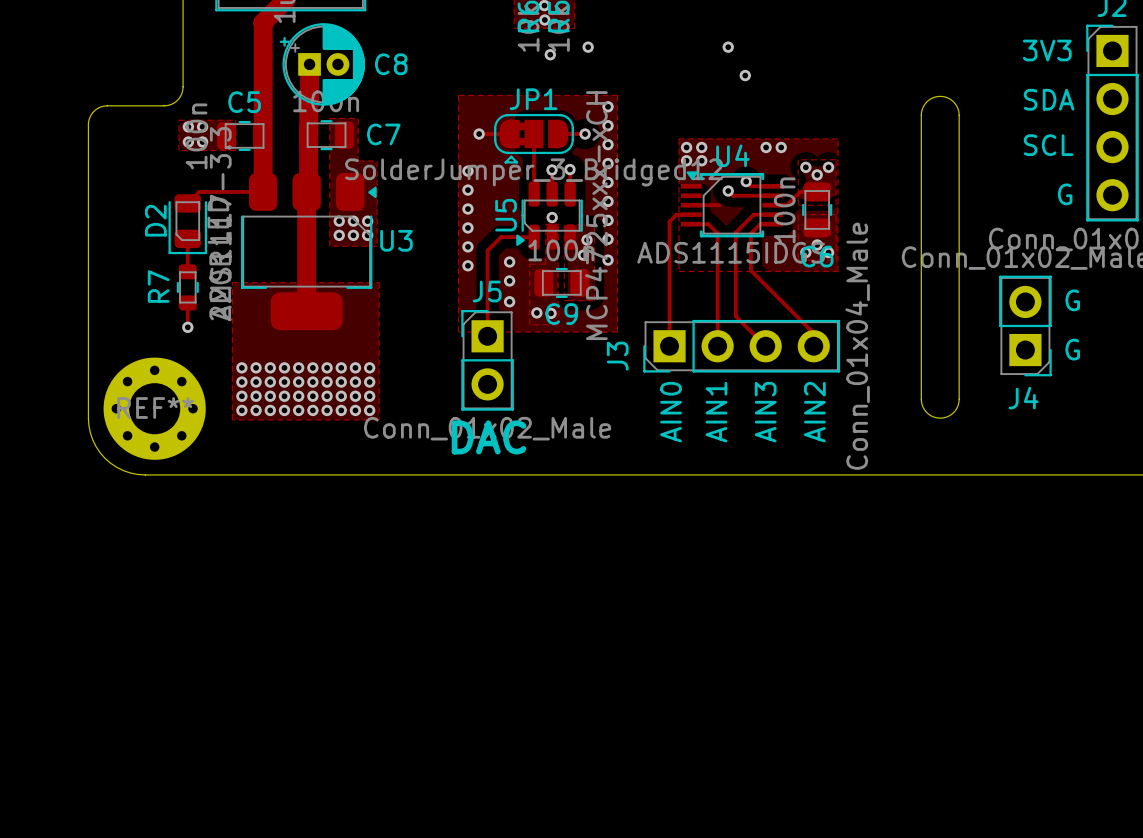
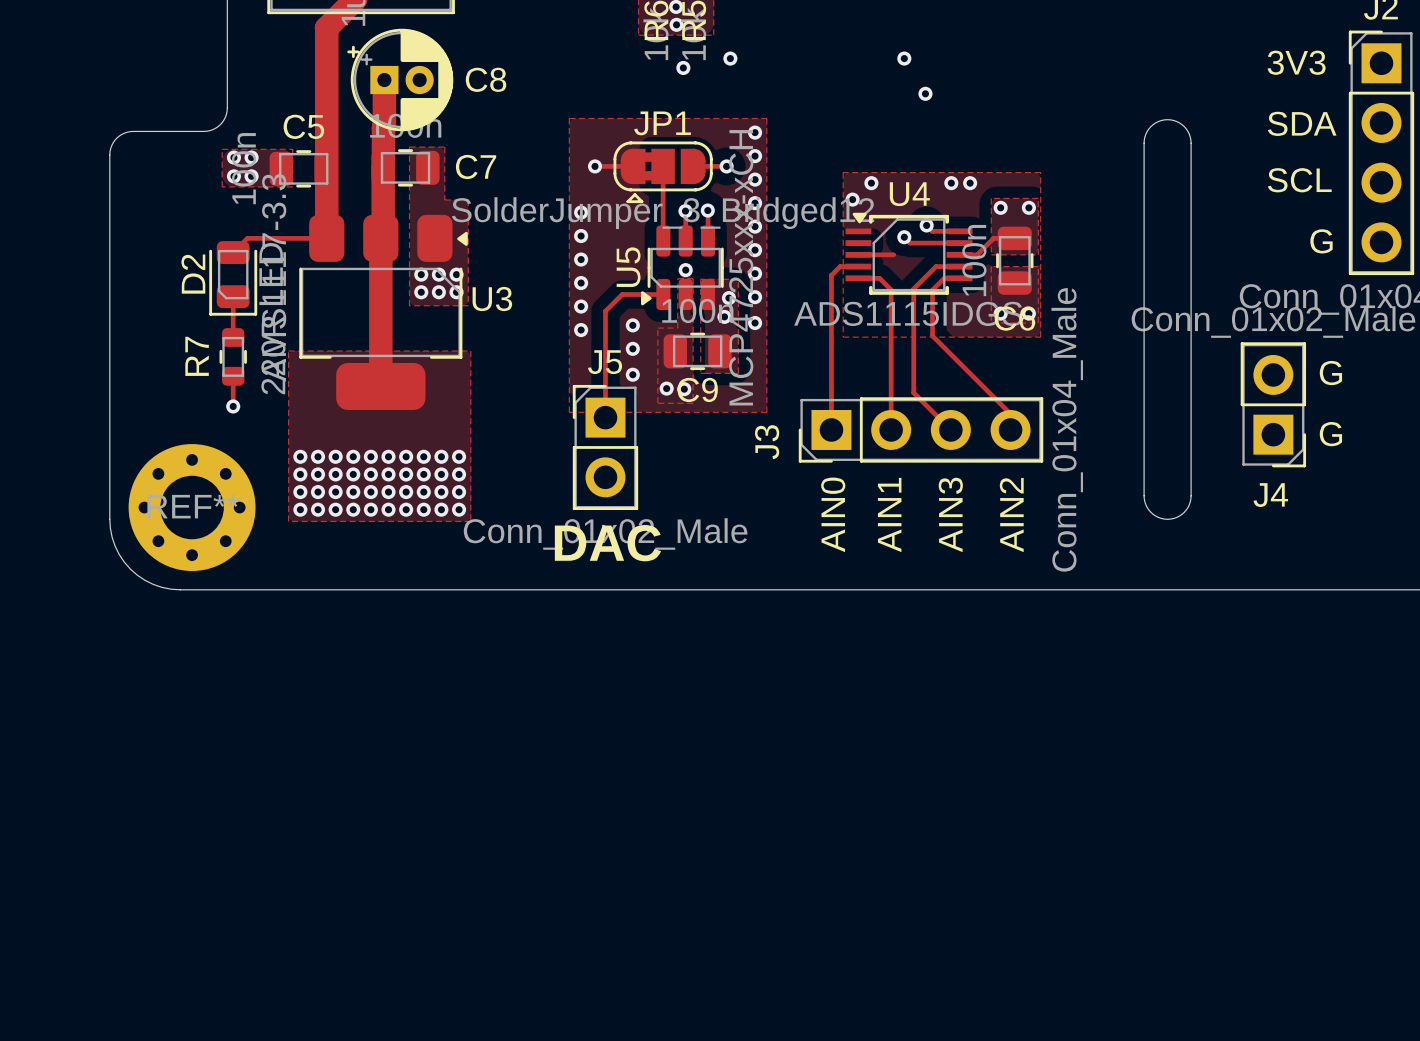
via: (686, 147) -> none
via: (701, 160) -> none
via: (817, 174) -> none
via: (817, 244) -> none

